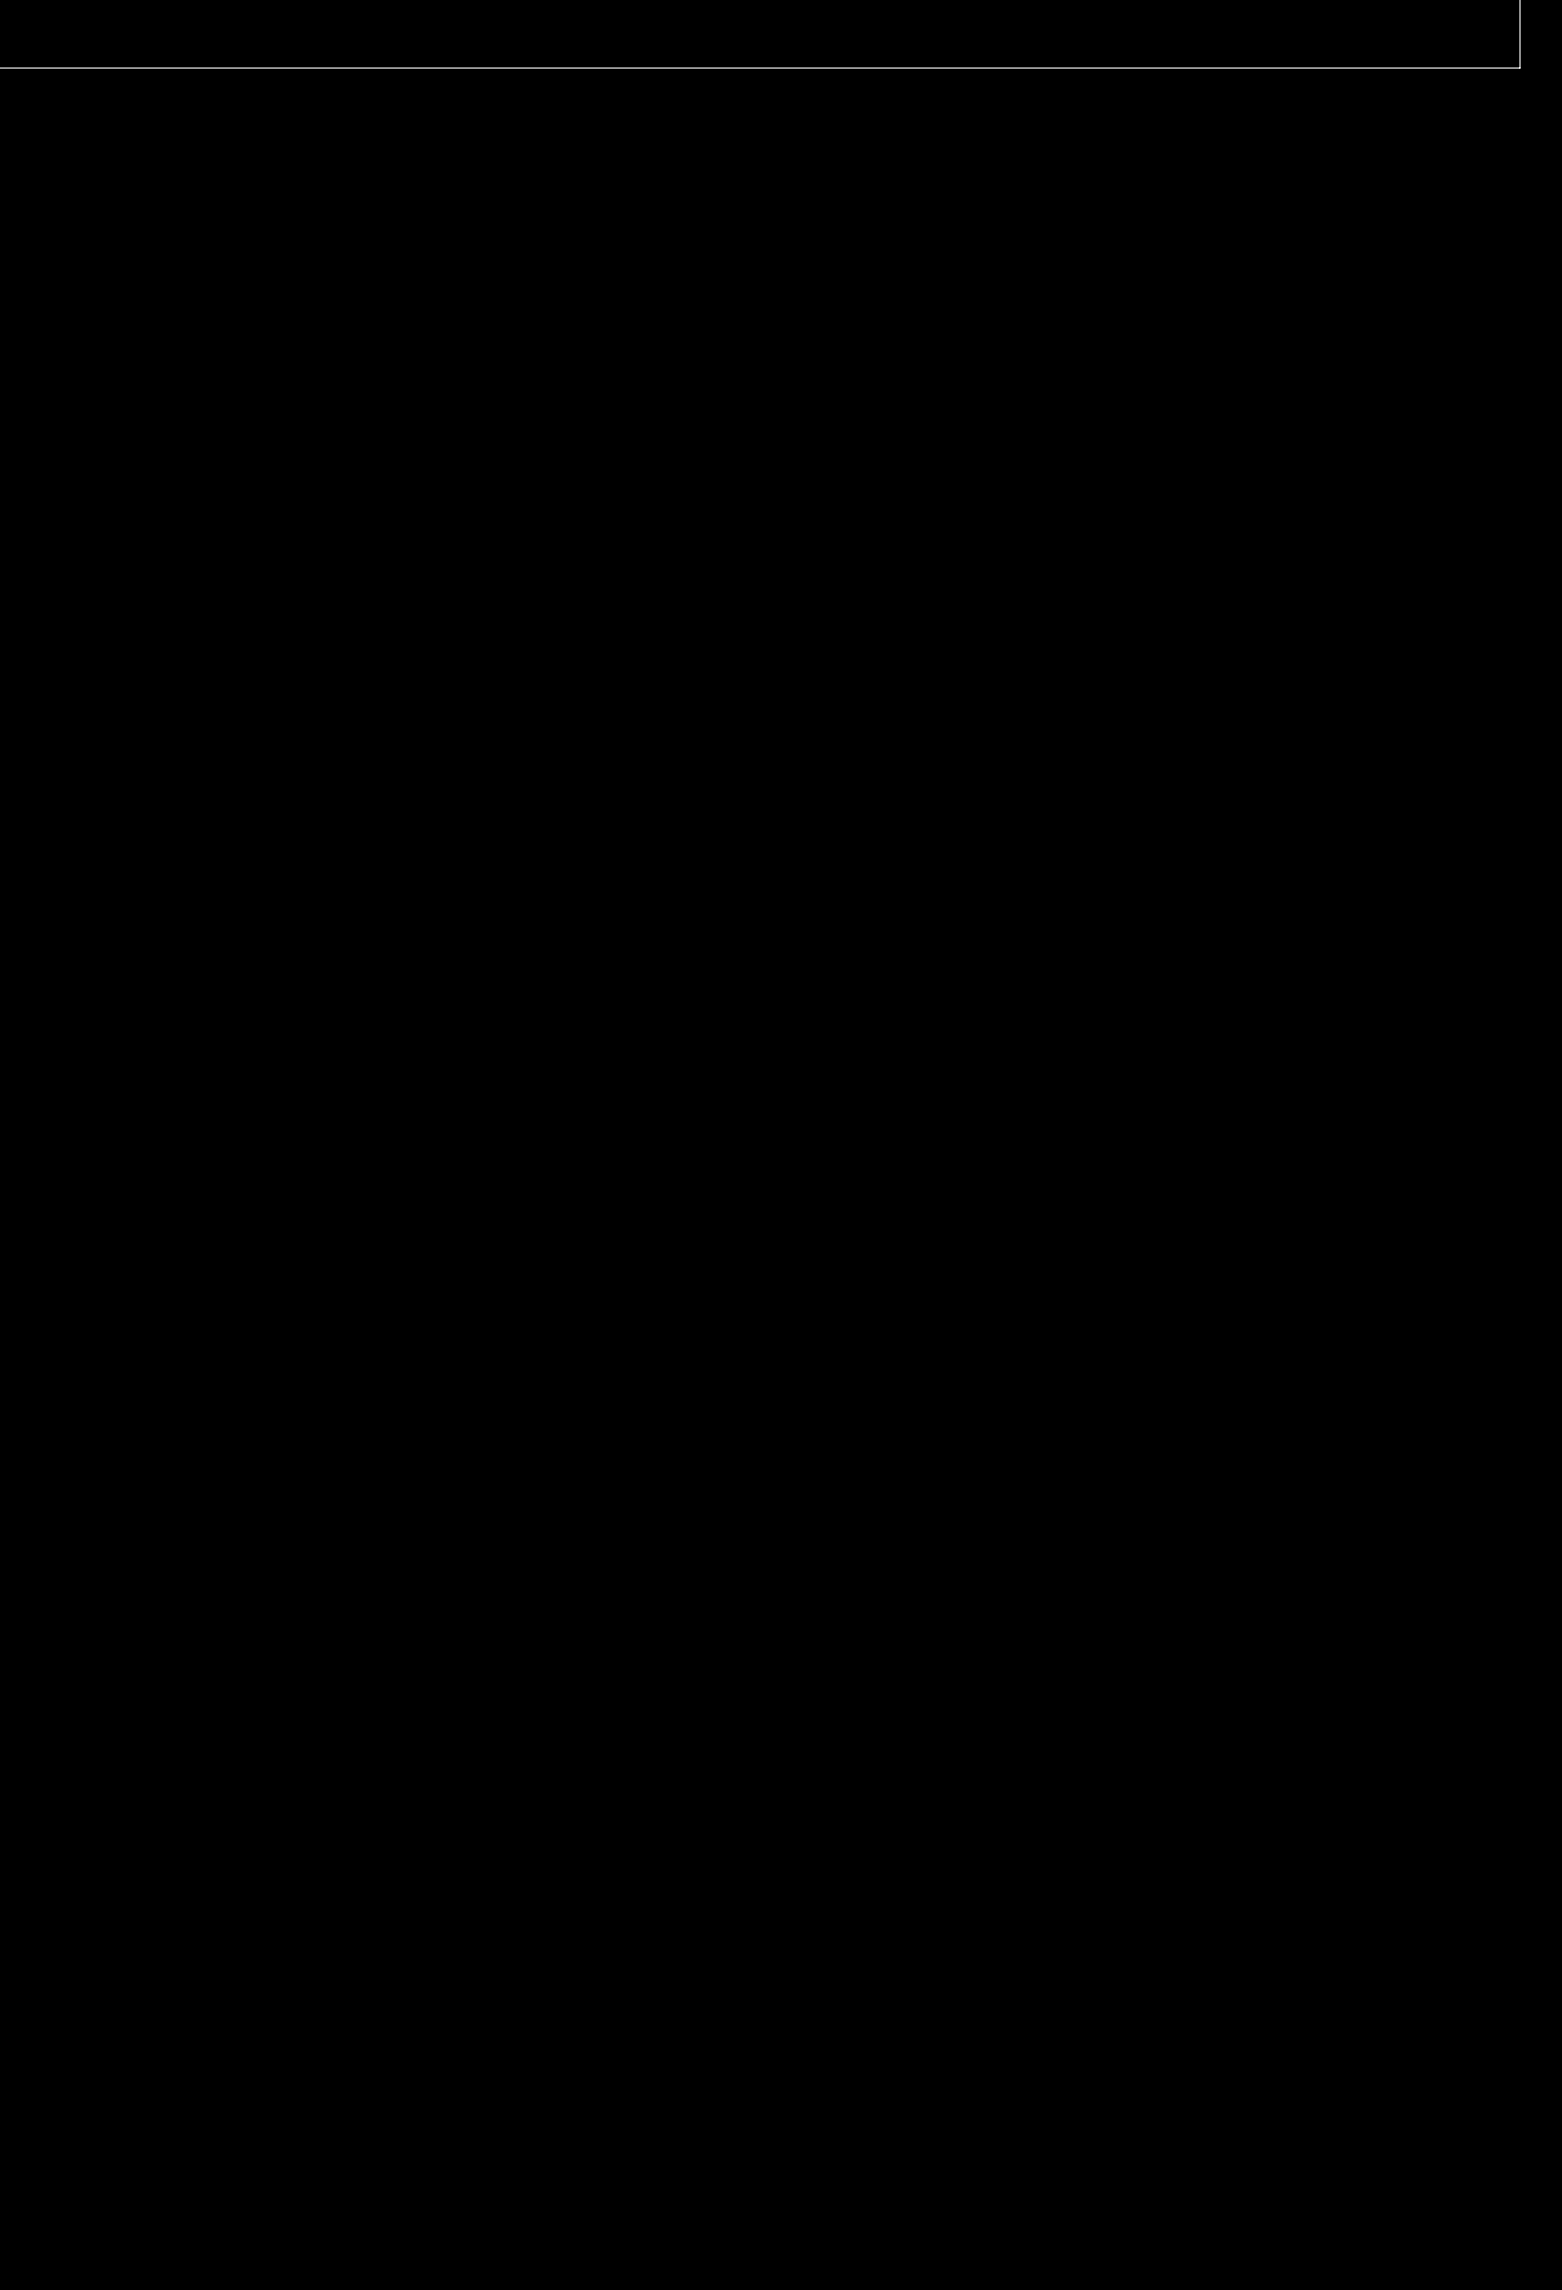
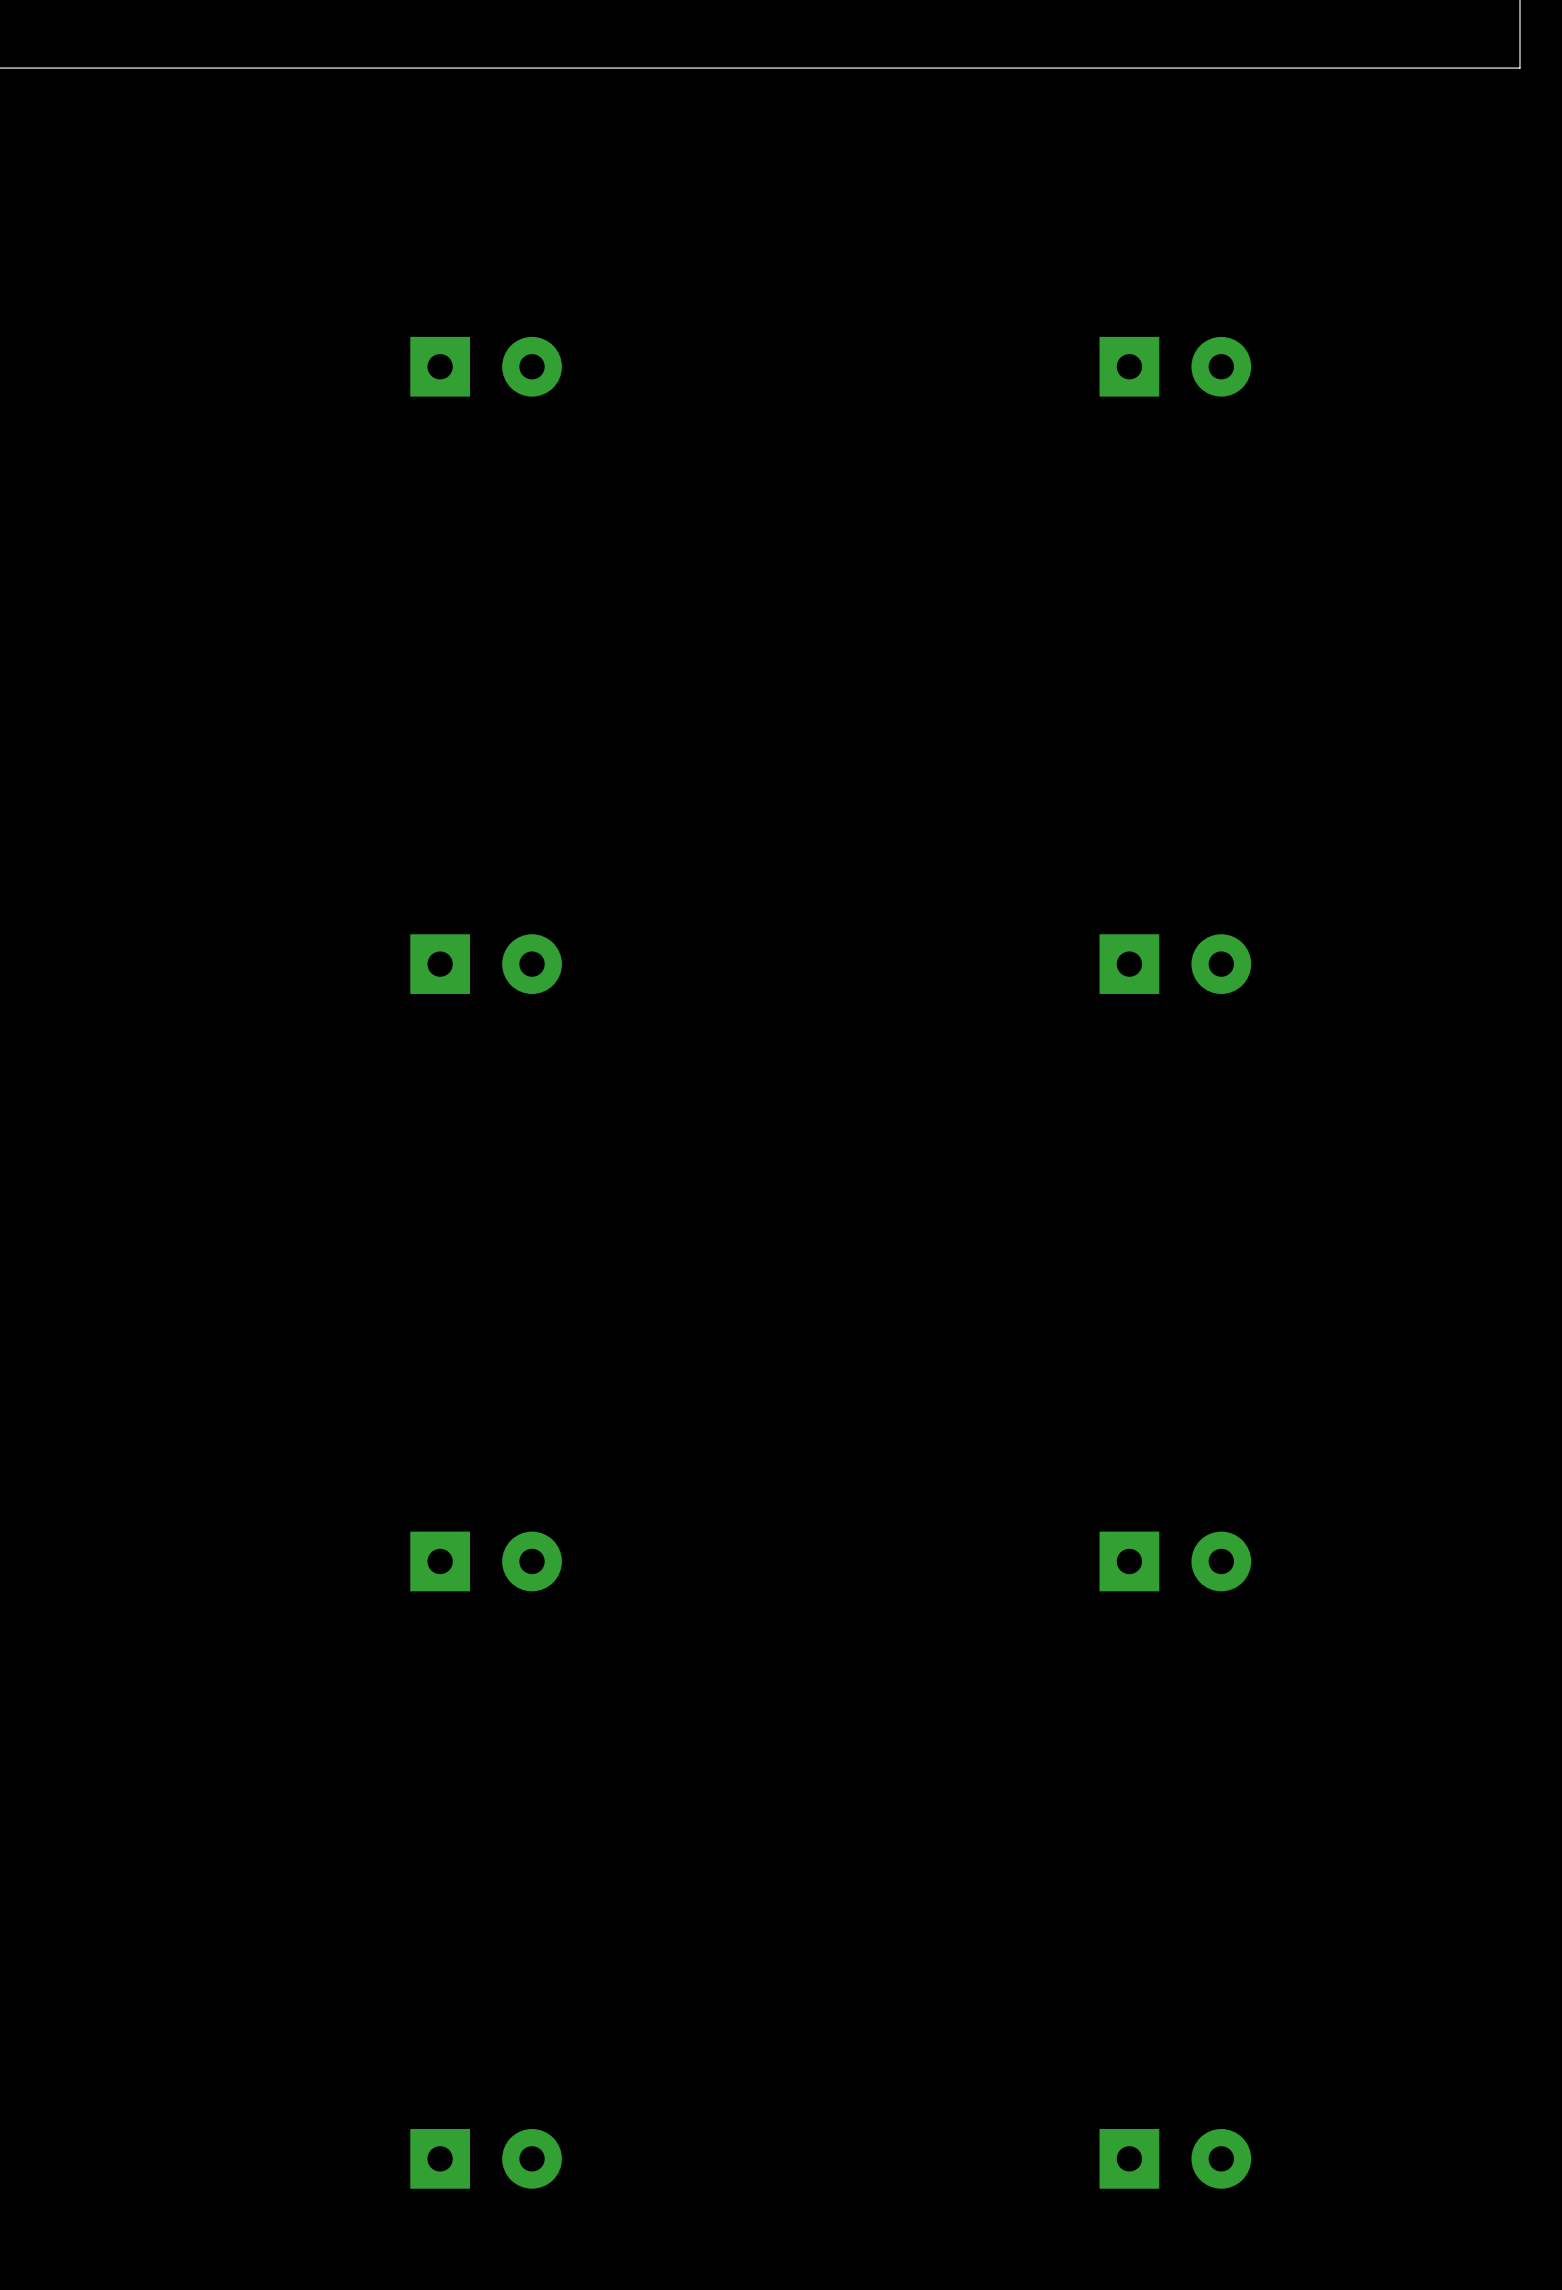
part: none -> (486, 366)
part: none -> (1175, 366)
part: none -> (486, 964)
part: none -> (1175, 964)
part: none -> (486, 1561)
part: none -> (1175, 1561)
part: none -> (486, 2158)
part: none -> (1175, 2158)

